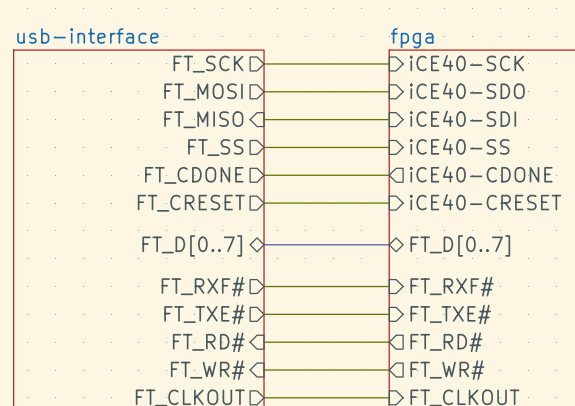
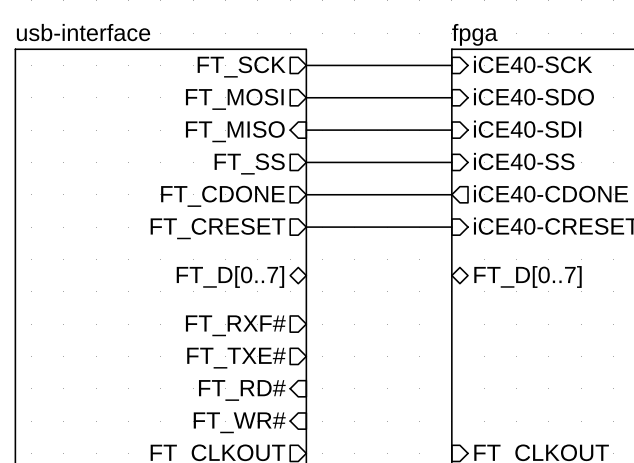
bus: (264, 244) (389, 244) -> none
wire: (264, 286) (389, 286) -> none
sheet pin: FT_RXF# (452, 286) -> none
wire: (264, 314) (389, 314) -> none
sheet pin: FT_TXE# (450, 314) -> none
wire: (264, 342) (389, 342) -> none
sheet pin: FT_RD# (446, 342) -> none
wire: (264, 370) (389, 370) -> none
sheet pin: FT_WR# (447, 370) -> none
wire: (264, 397) (389, 397) -> none

